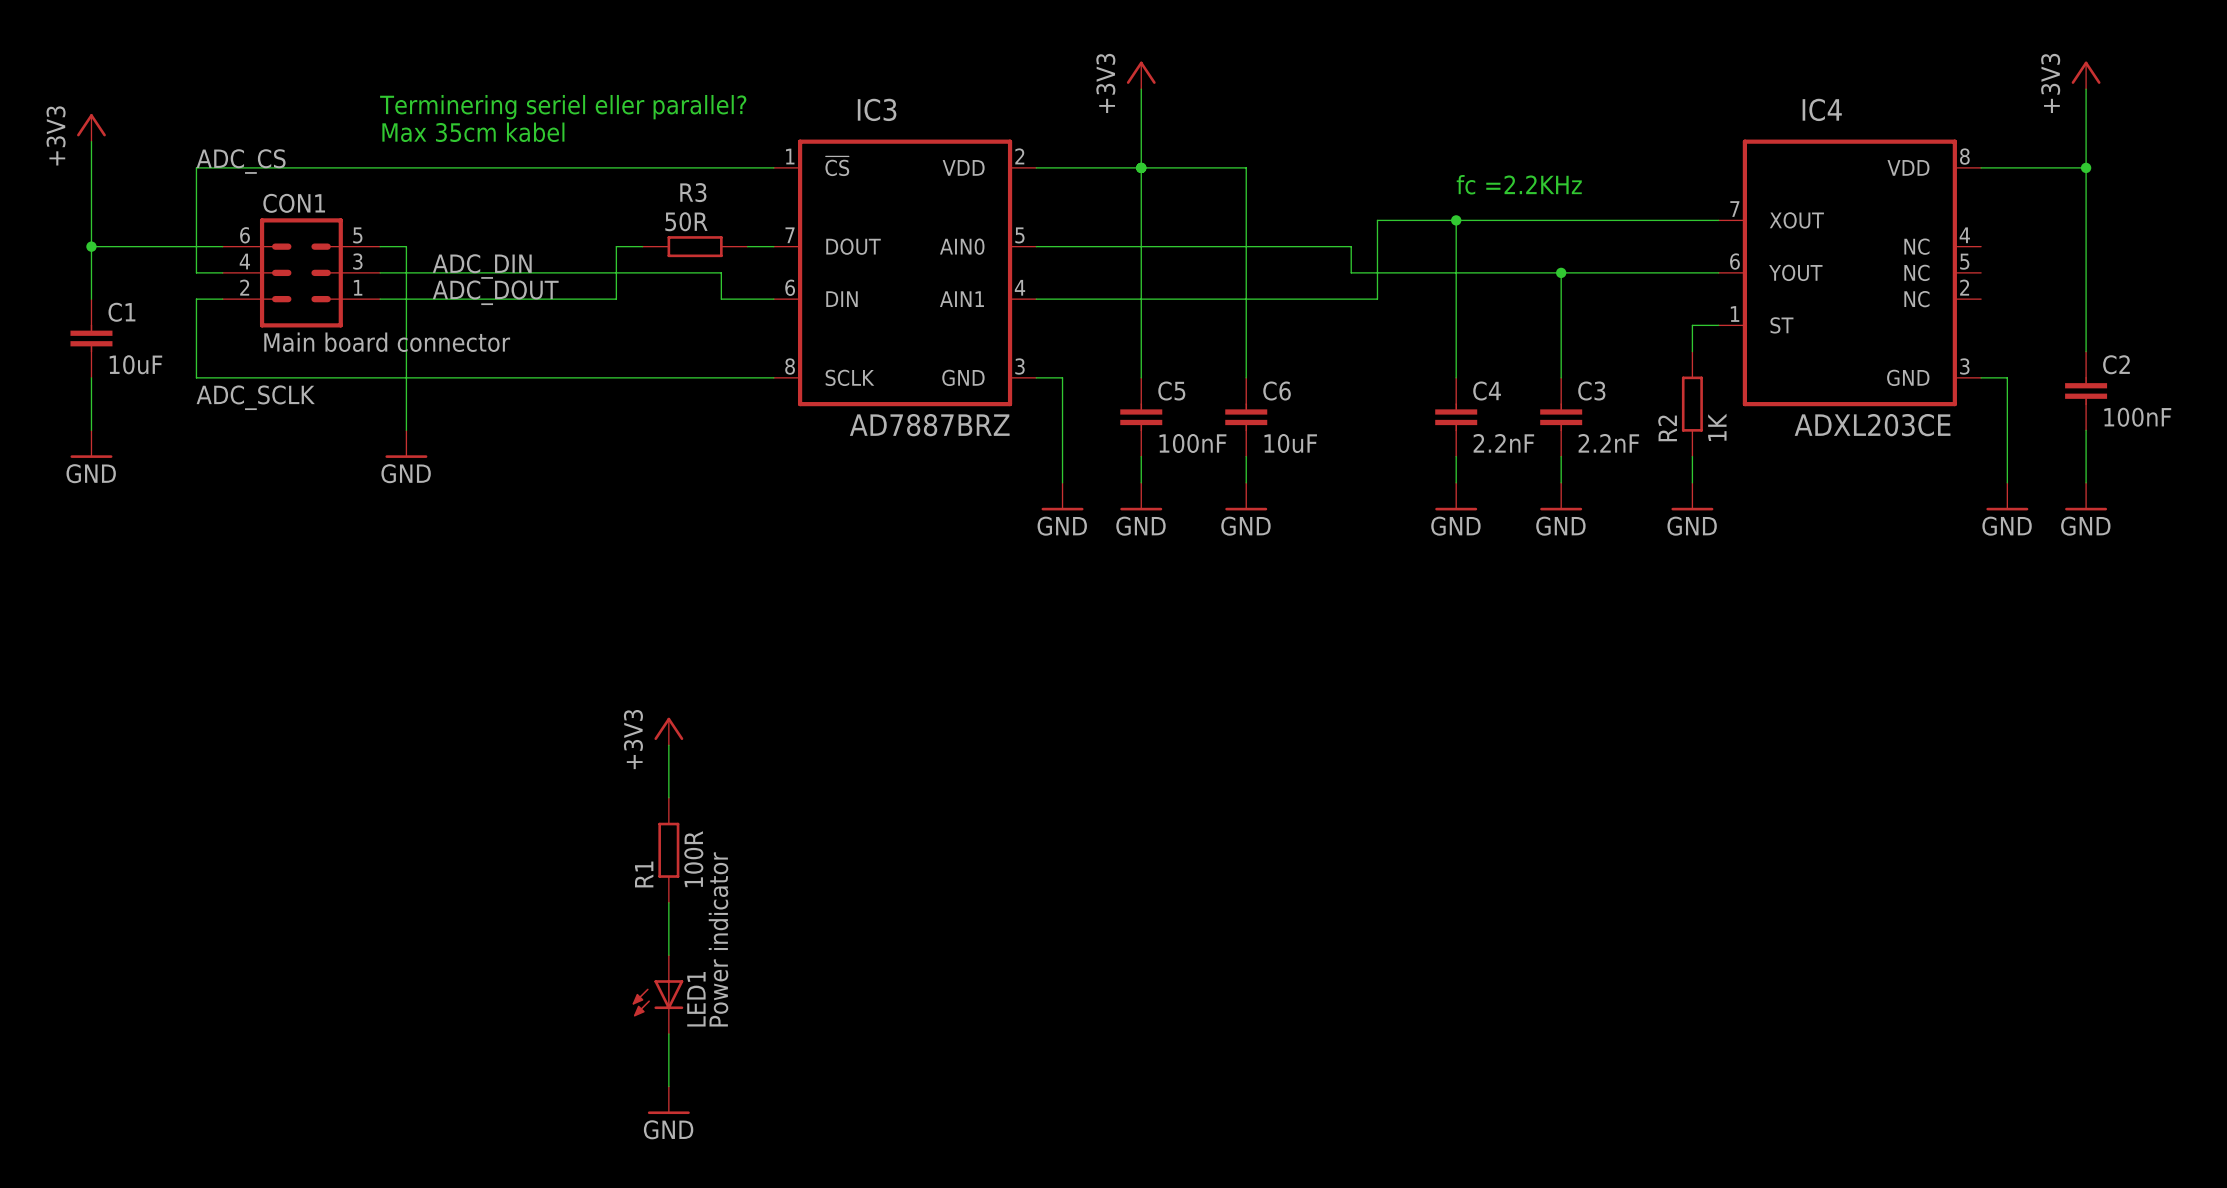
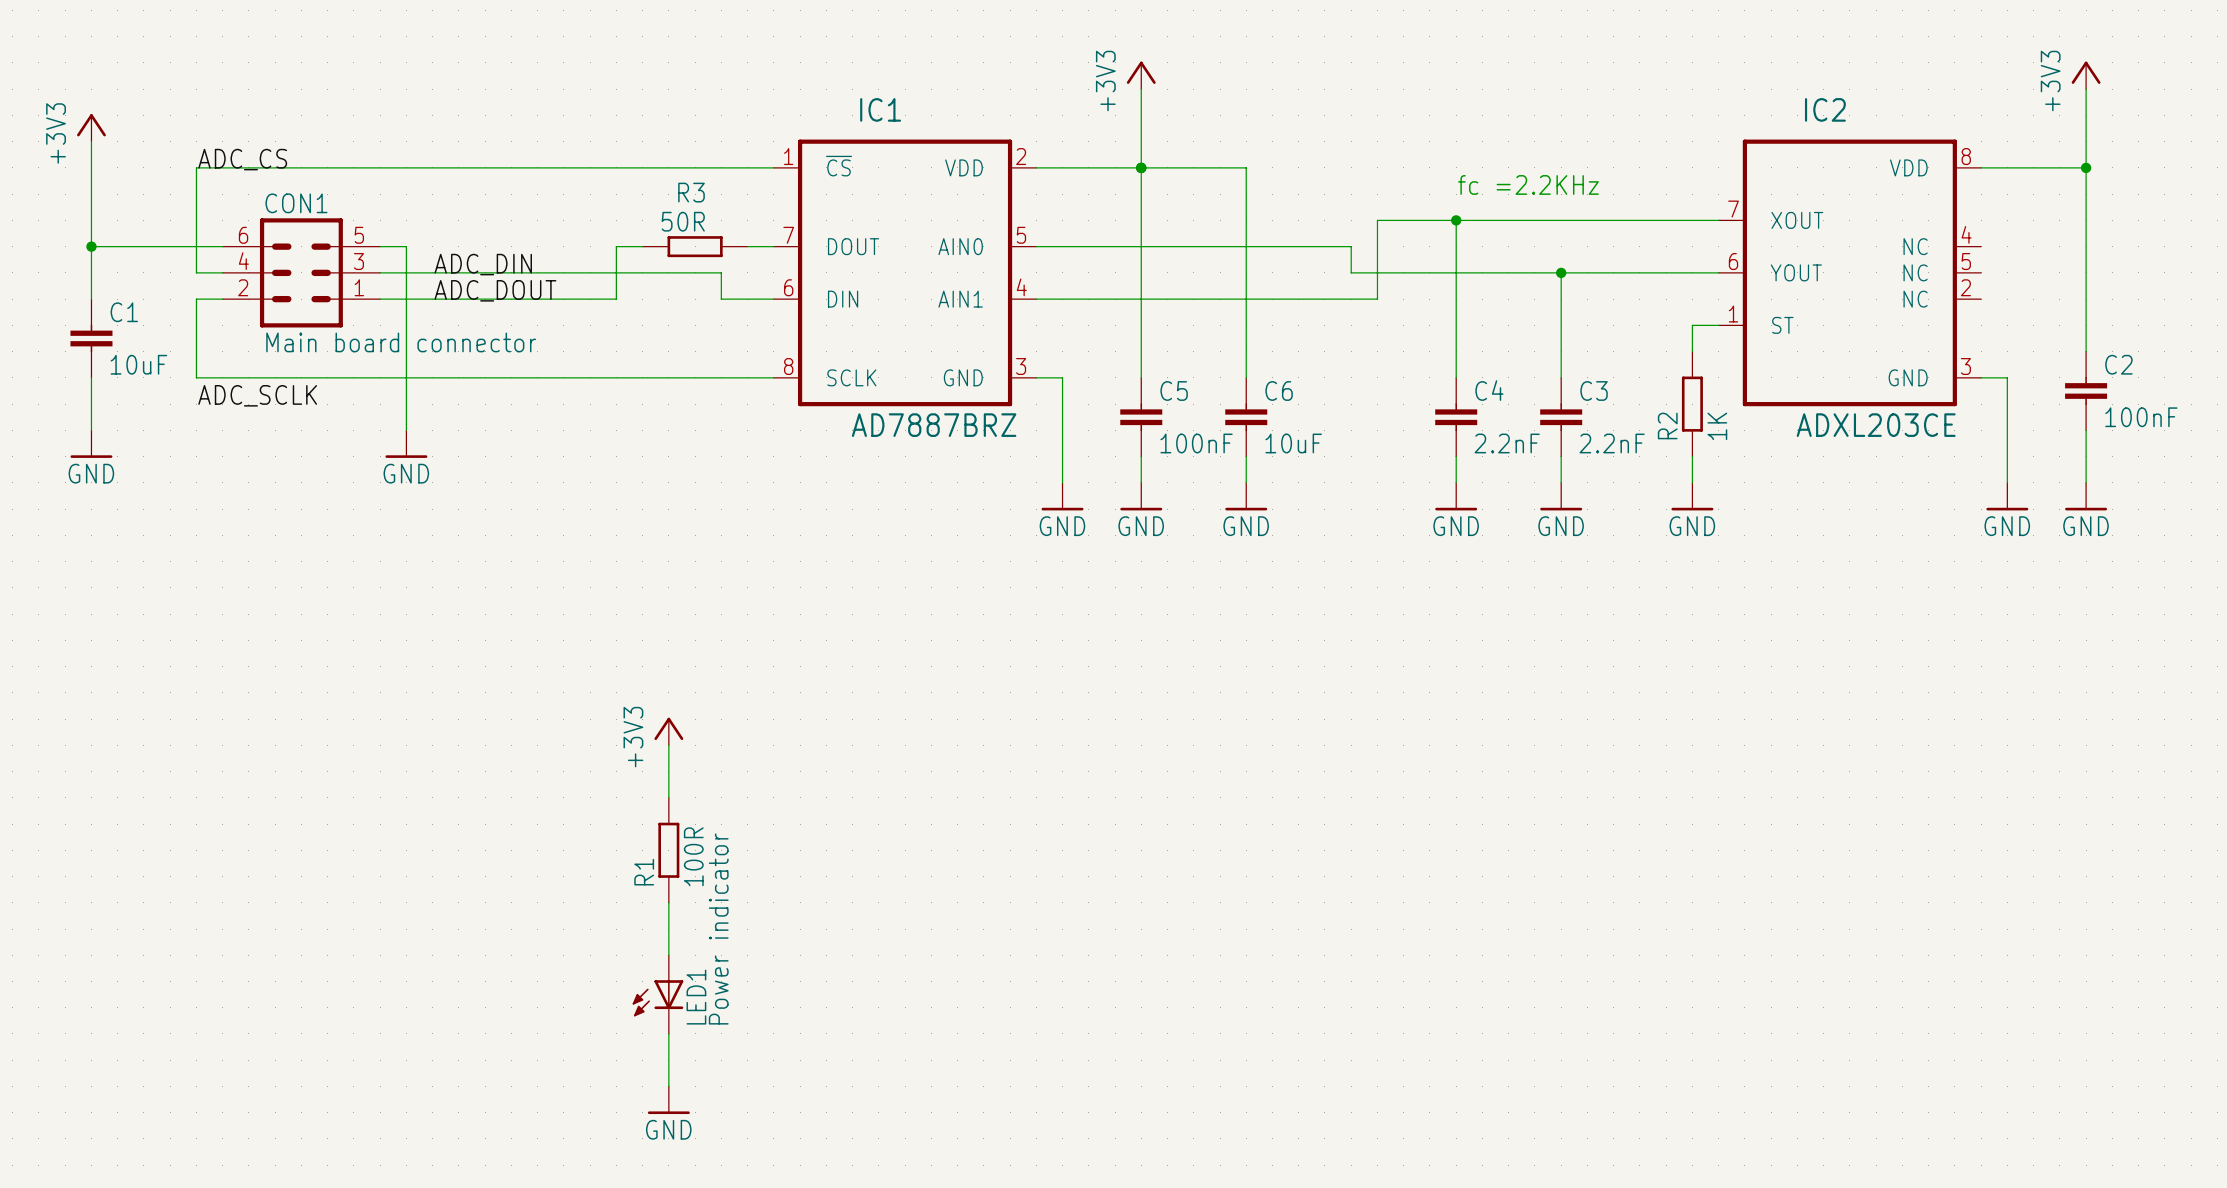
text: Terminering seriel eller parallel? (563, 107) -> none
IC3 name: IC3 (877, 109) -> IC1 (880, 109)
IC4 name: IC4 (1822, 109) -> IC2 (1825, 109)
text: Max 35cm kabel (473, 132) -> none

